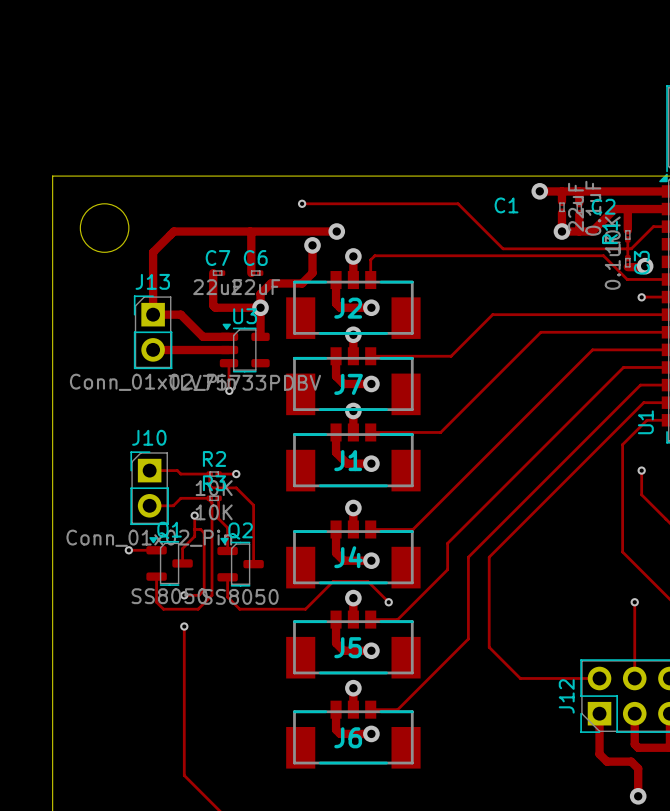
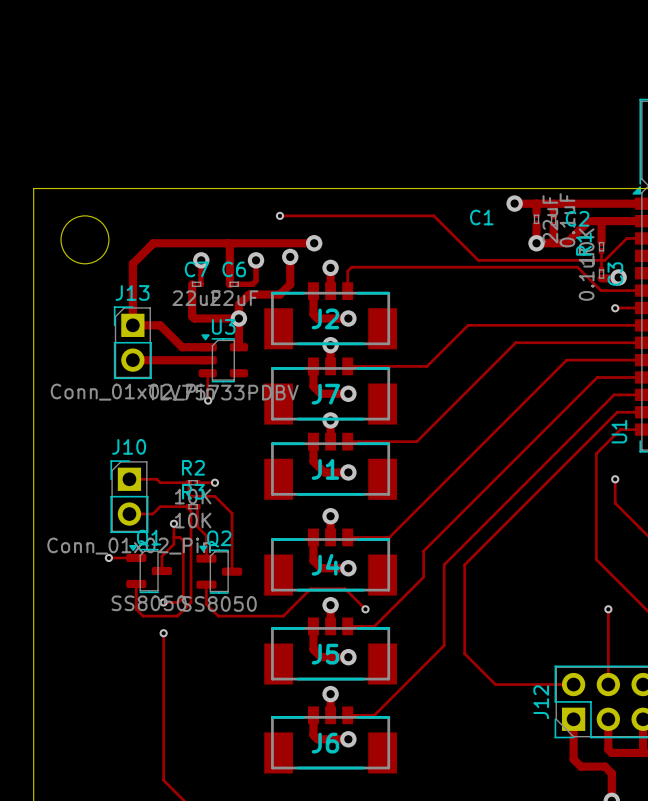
track: none -> (201, 260) (200, 284)
via: none -> (201, 260)
track: none -> (256, 260) (256, 280) (252, 284) (239, 284)
via: none -> (256, 260)

